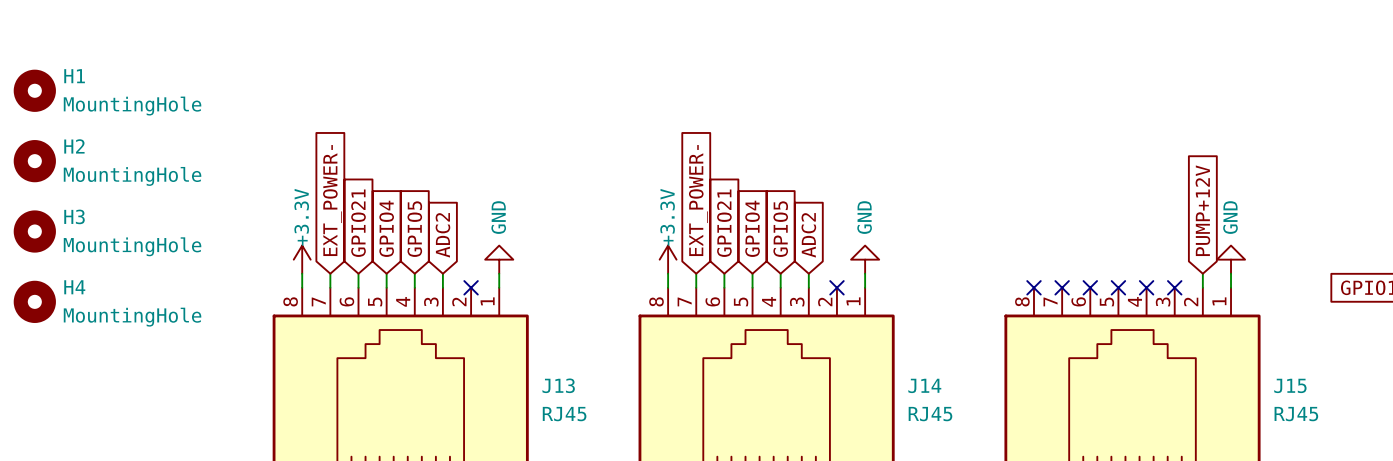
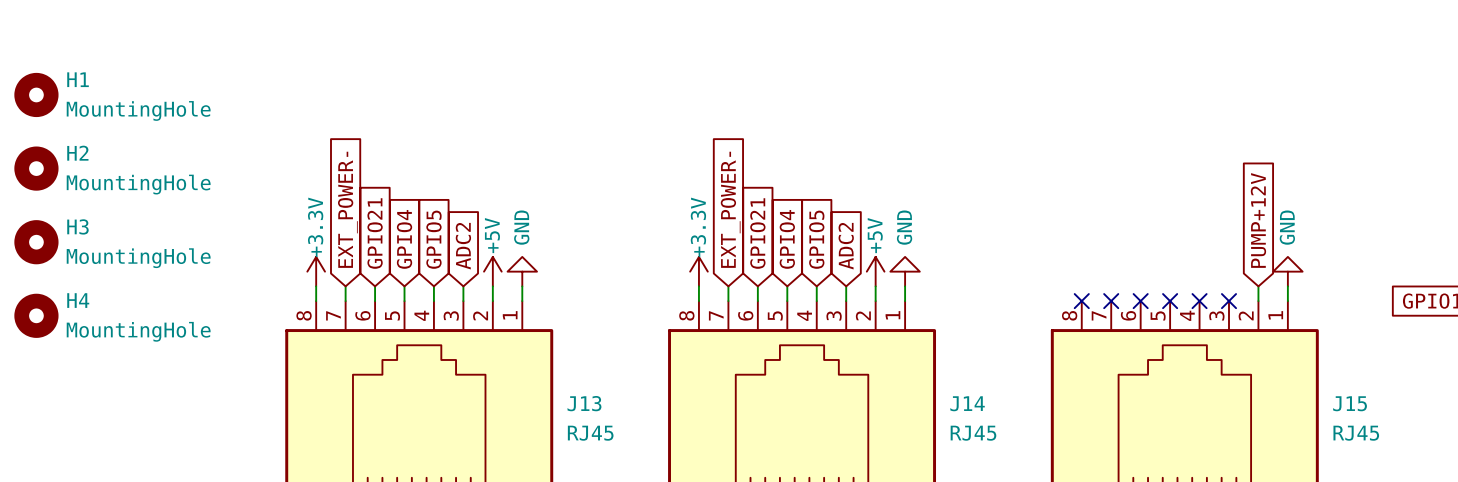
power symbol: none -> +5V (492, 271)
power symbol: none -> +5V (875, 271)
wire: none -> (492, 286) (492, 301)
wire: none -> (875, 286) (875, 301)
no-connect mark: (471, 287) -> none
no-connect mark: (836, 287) -> none

